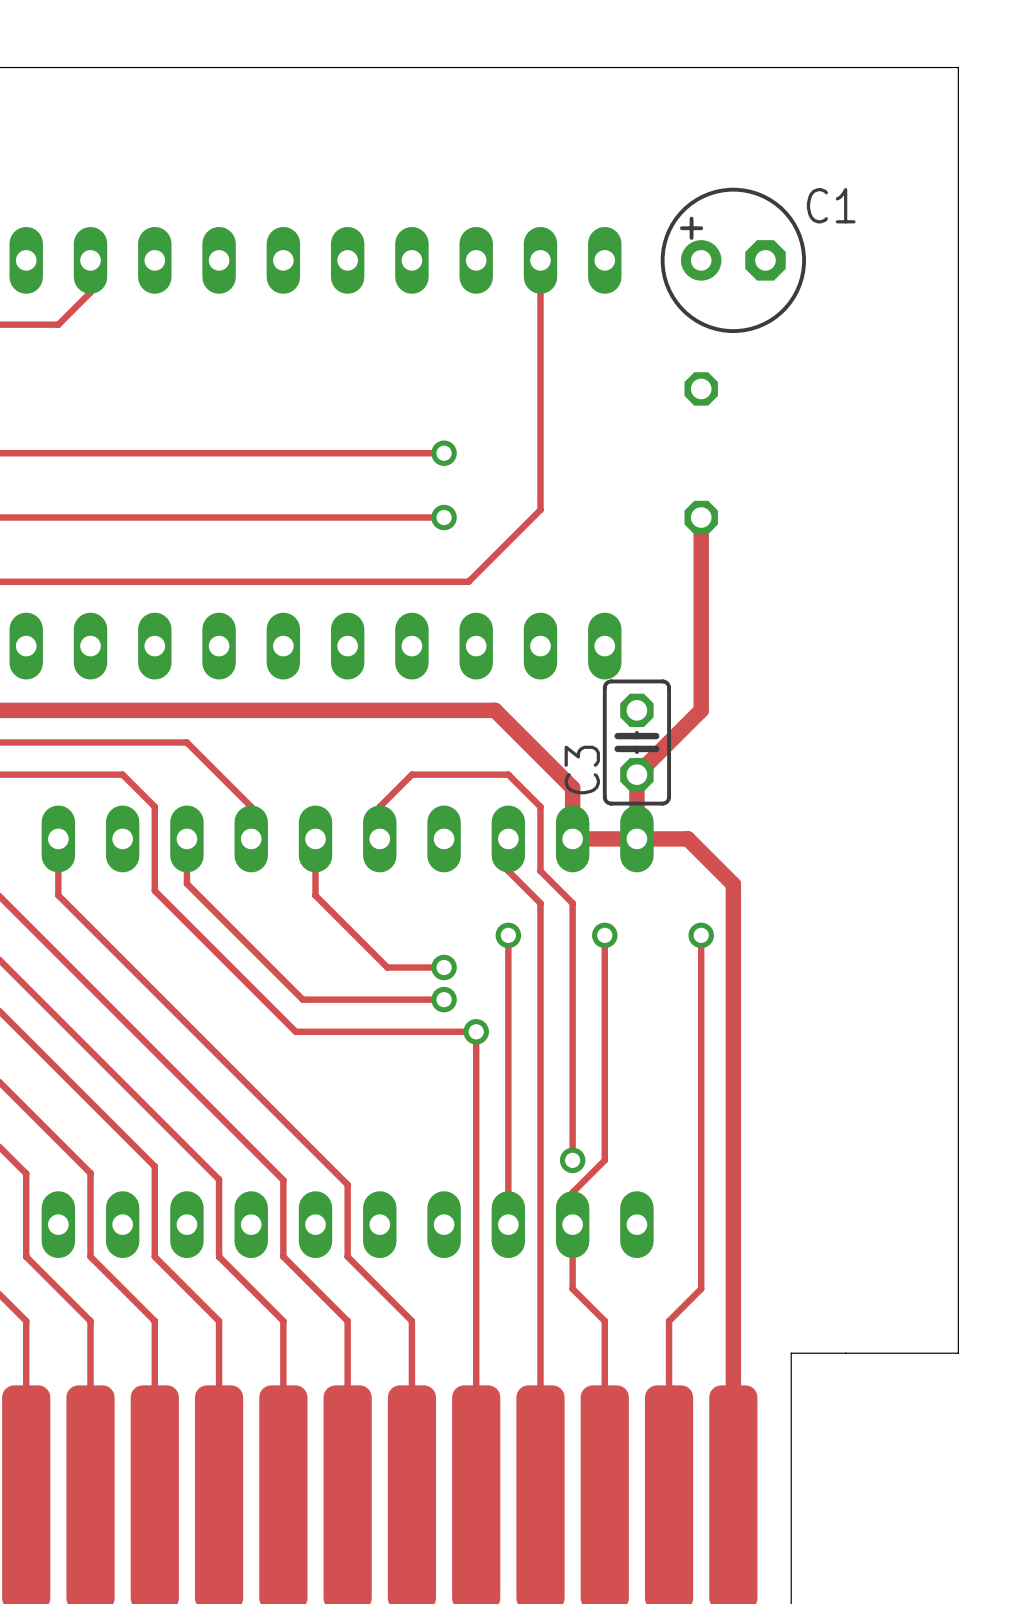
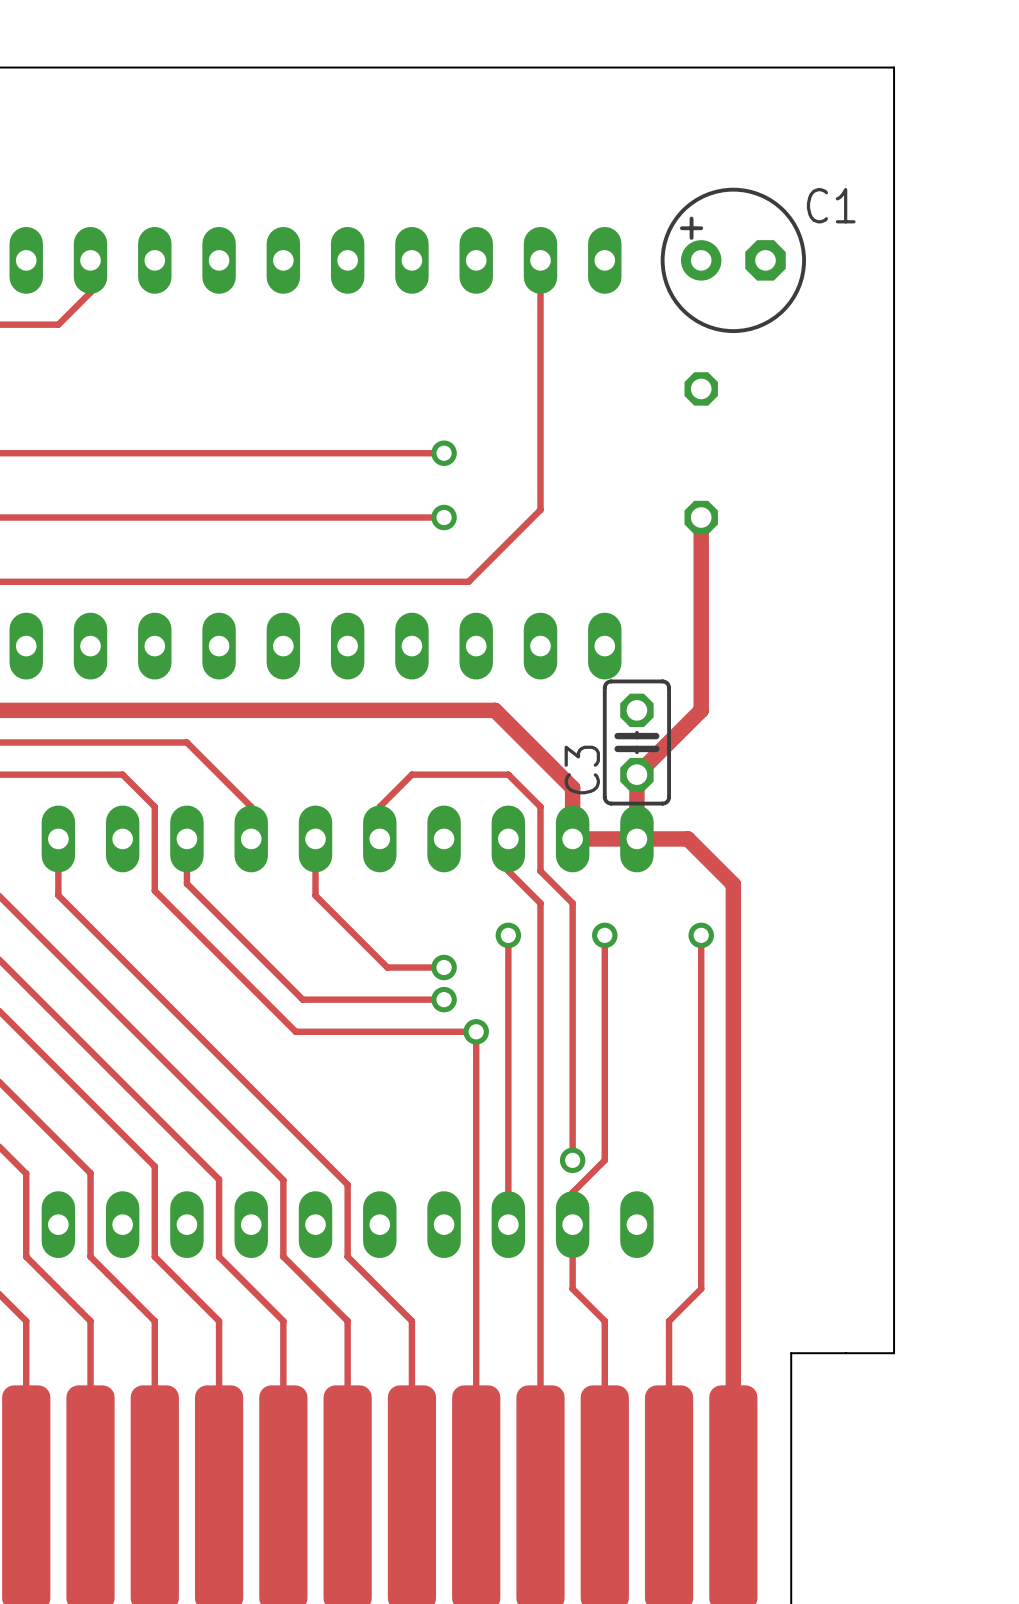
board edge: (894, 67) (958, 67) (958, 1353) (894, 1353) -> (894, 67) (894, 1353)

